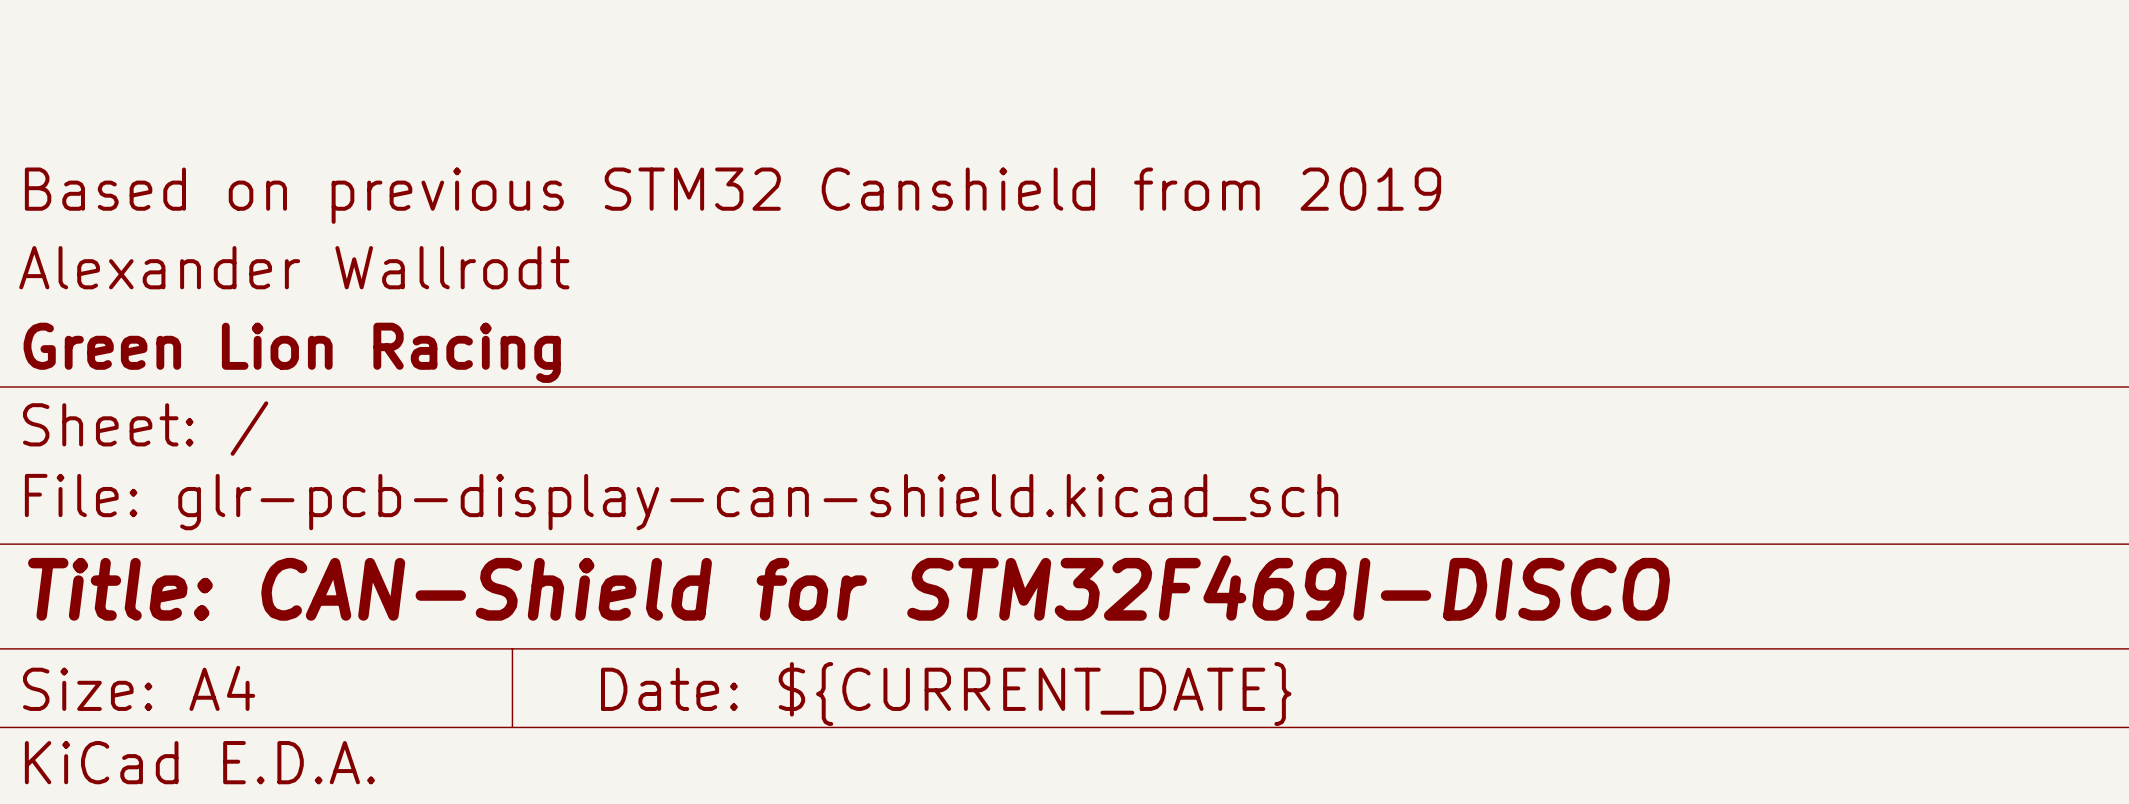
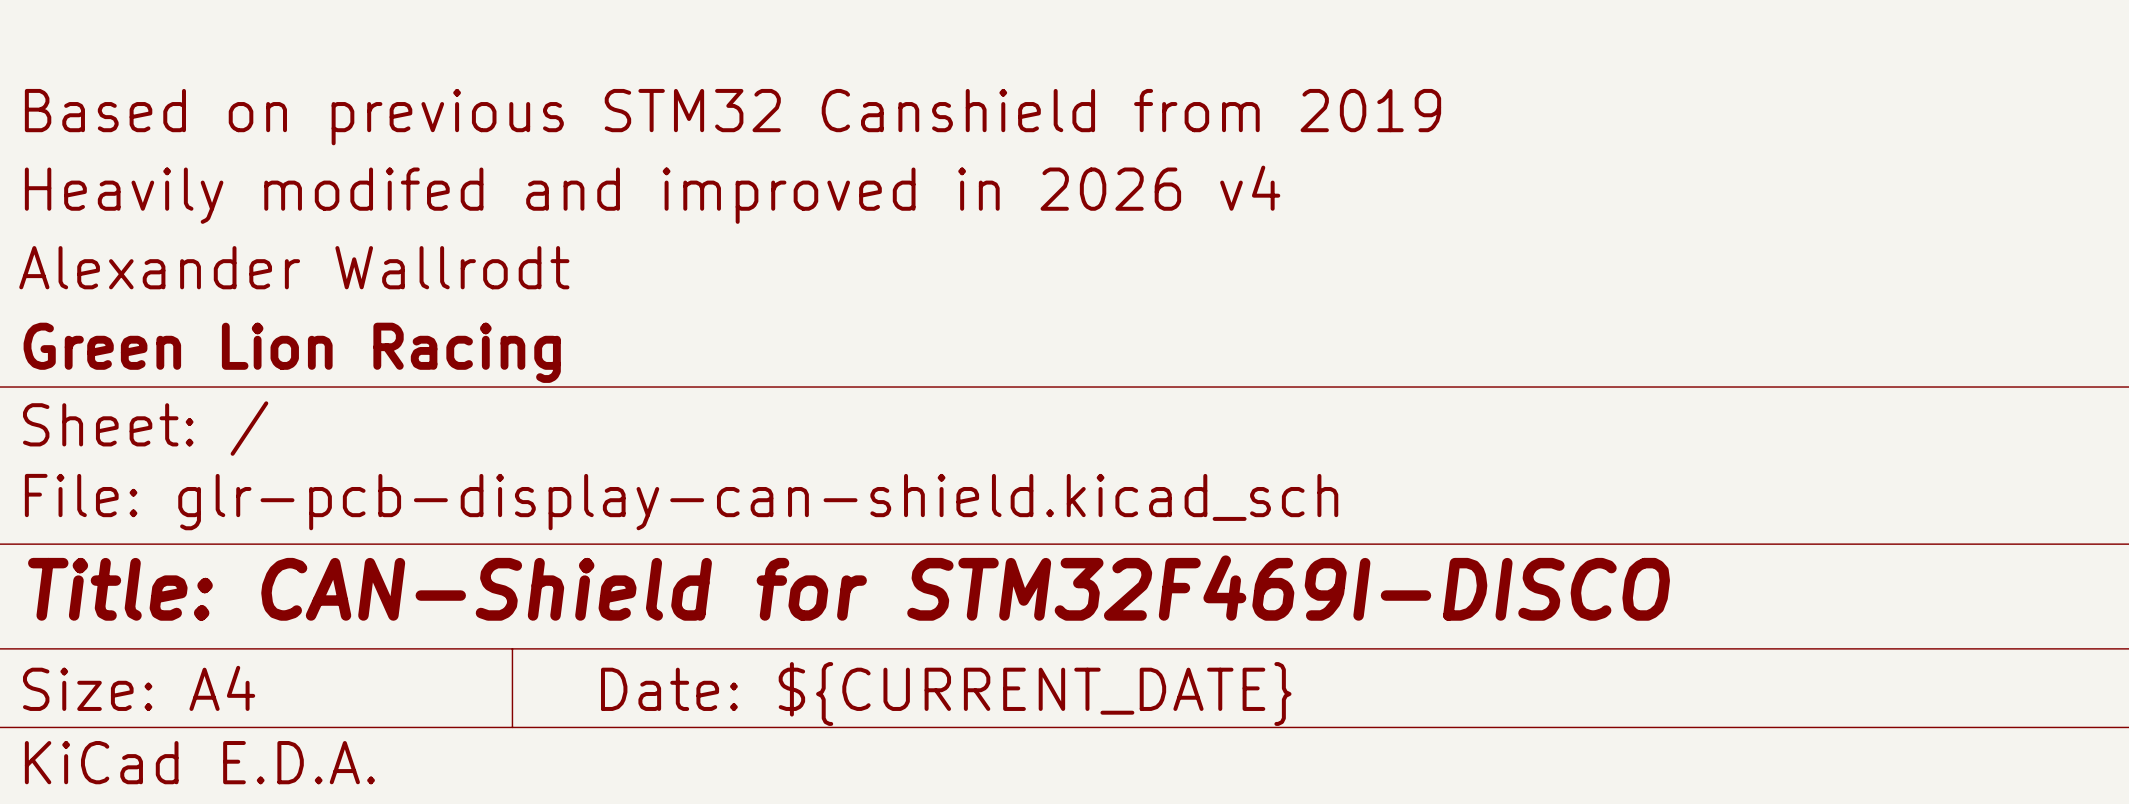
title block: none -> Based on previous STM32 Canshield from 2019 (732, 117)
title block: Based on previous STM32 Canshield from 2019 (732, 195) -> Heavily modifed and improved in 2026 v4 (652, 194)

